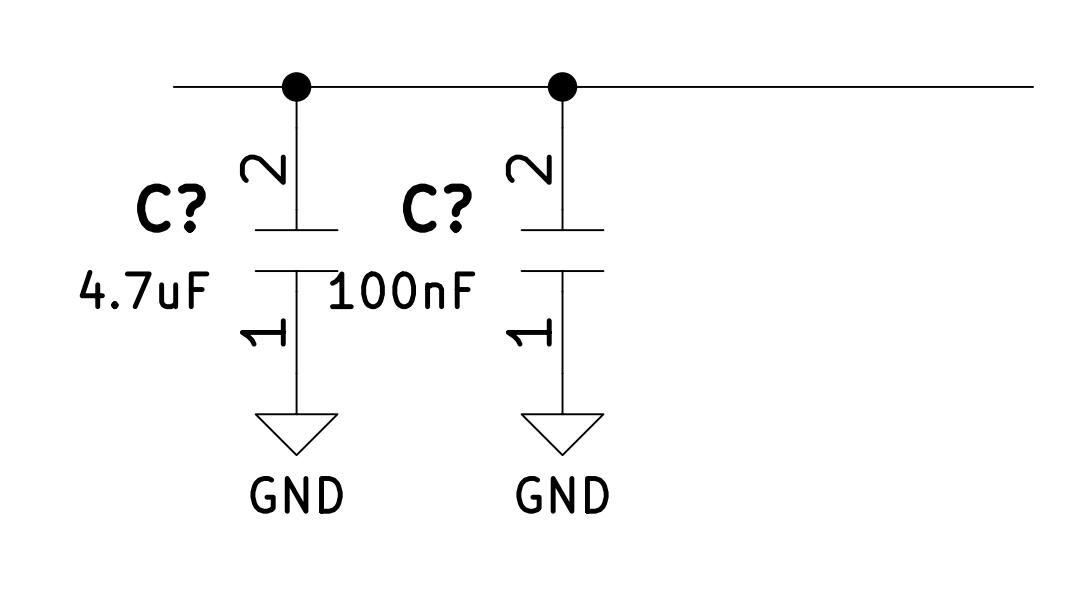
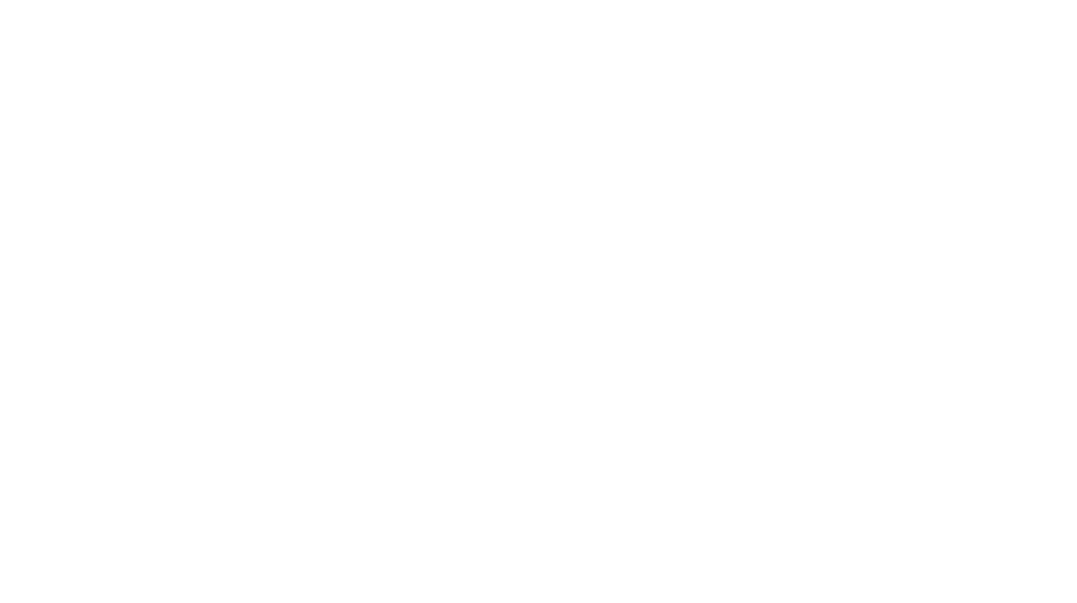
wire: (173, 86) (1033, 86) -> none
wire: (296, 86) (296, 127) -> none
junction: (296, 86) -> none
wire: (562, 86) (562, 127) -> none
junction: (562, 86) -> none
C?: 4.7uF (296, 250) -> none
C?: 100nF (562, 250) -> none
power symbol: GND (296, 414) -> none
power symbol: GND (562, 414) -> none

